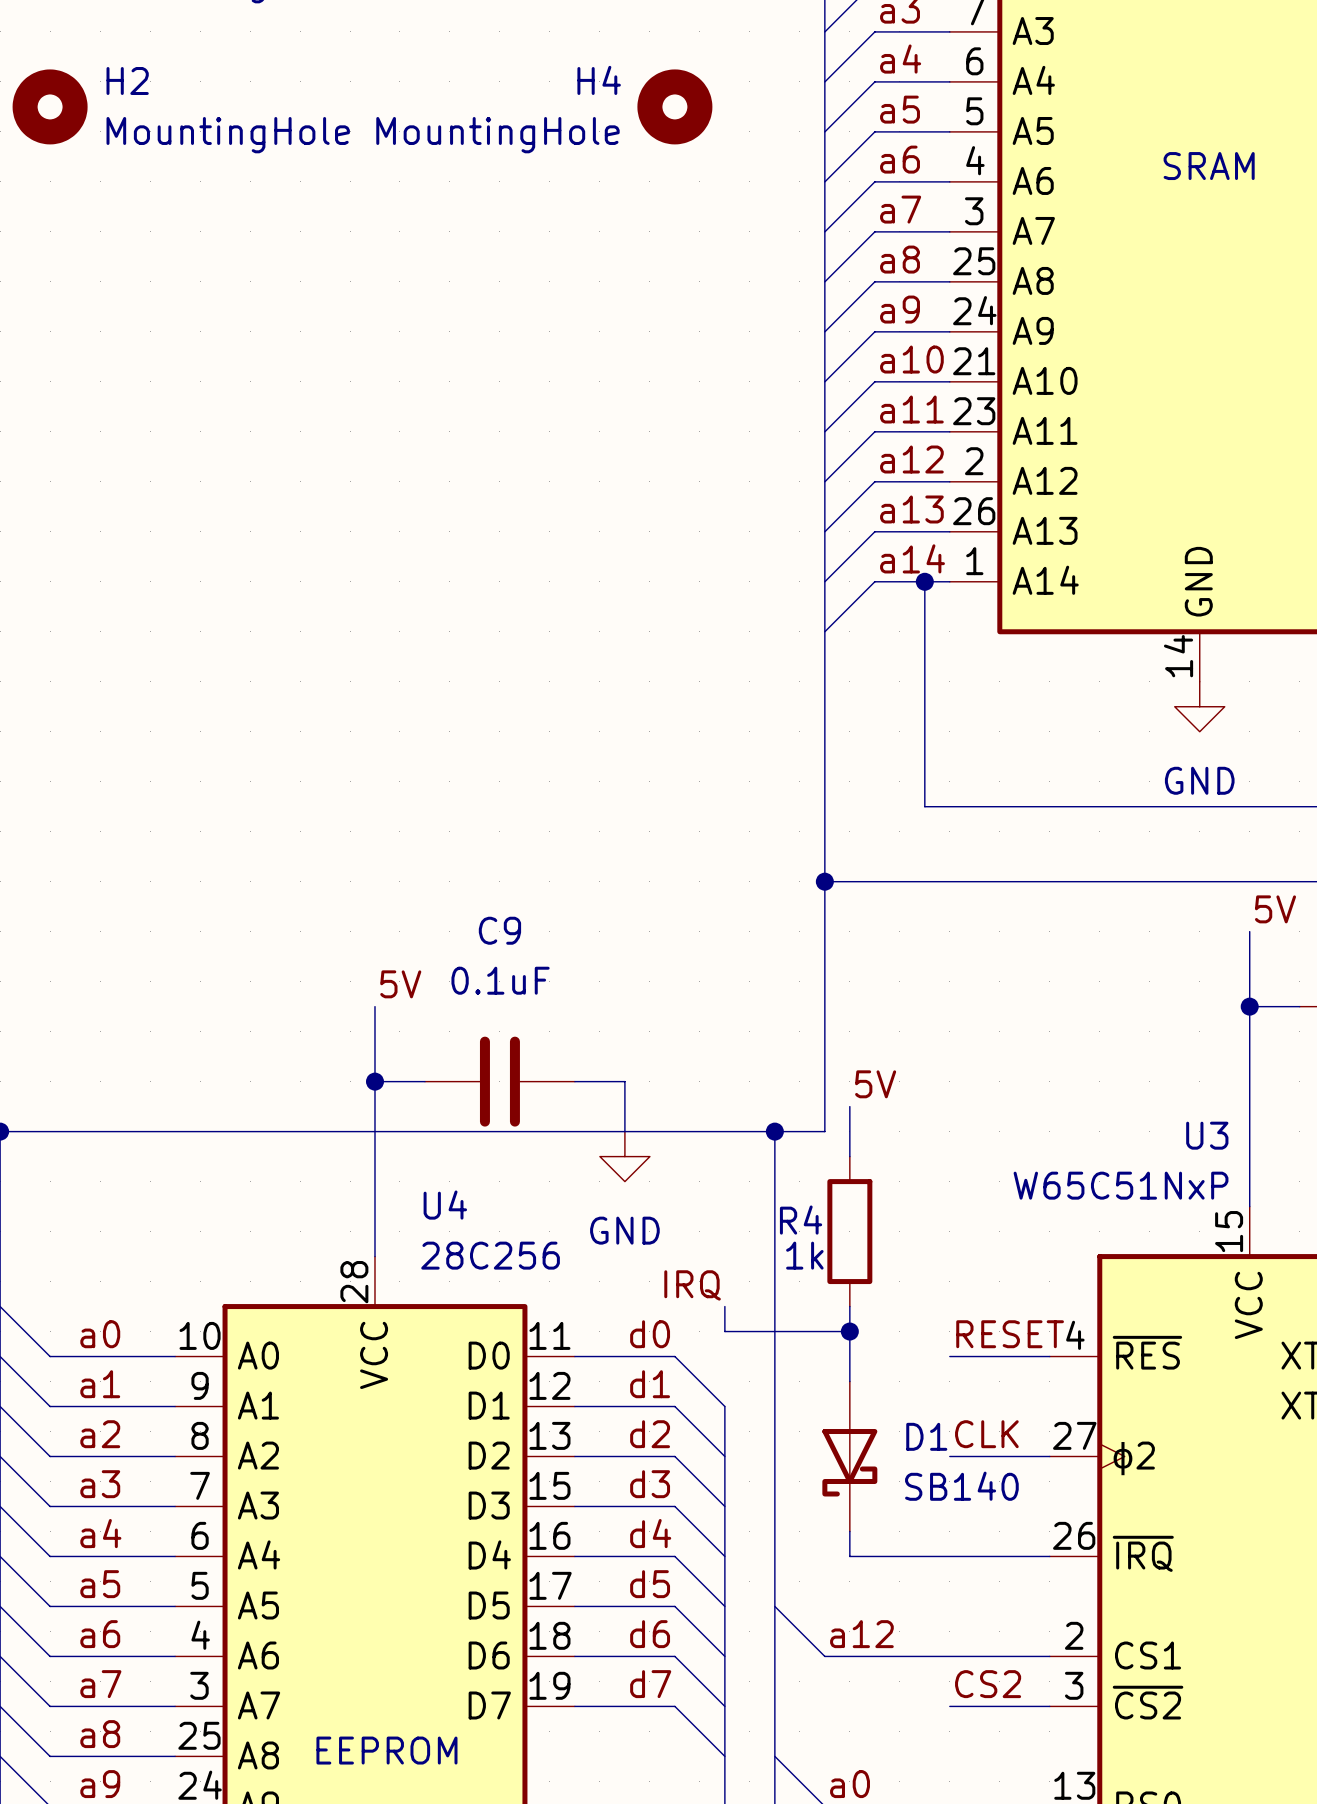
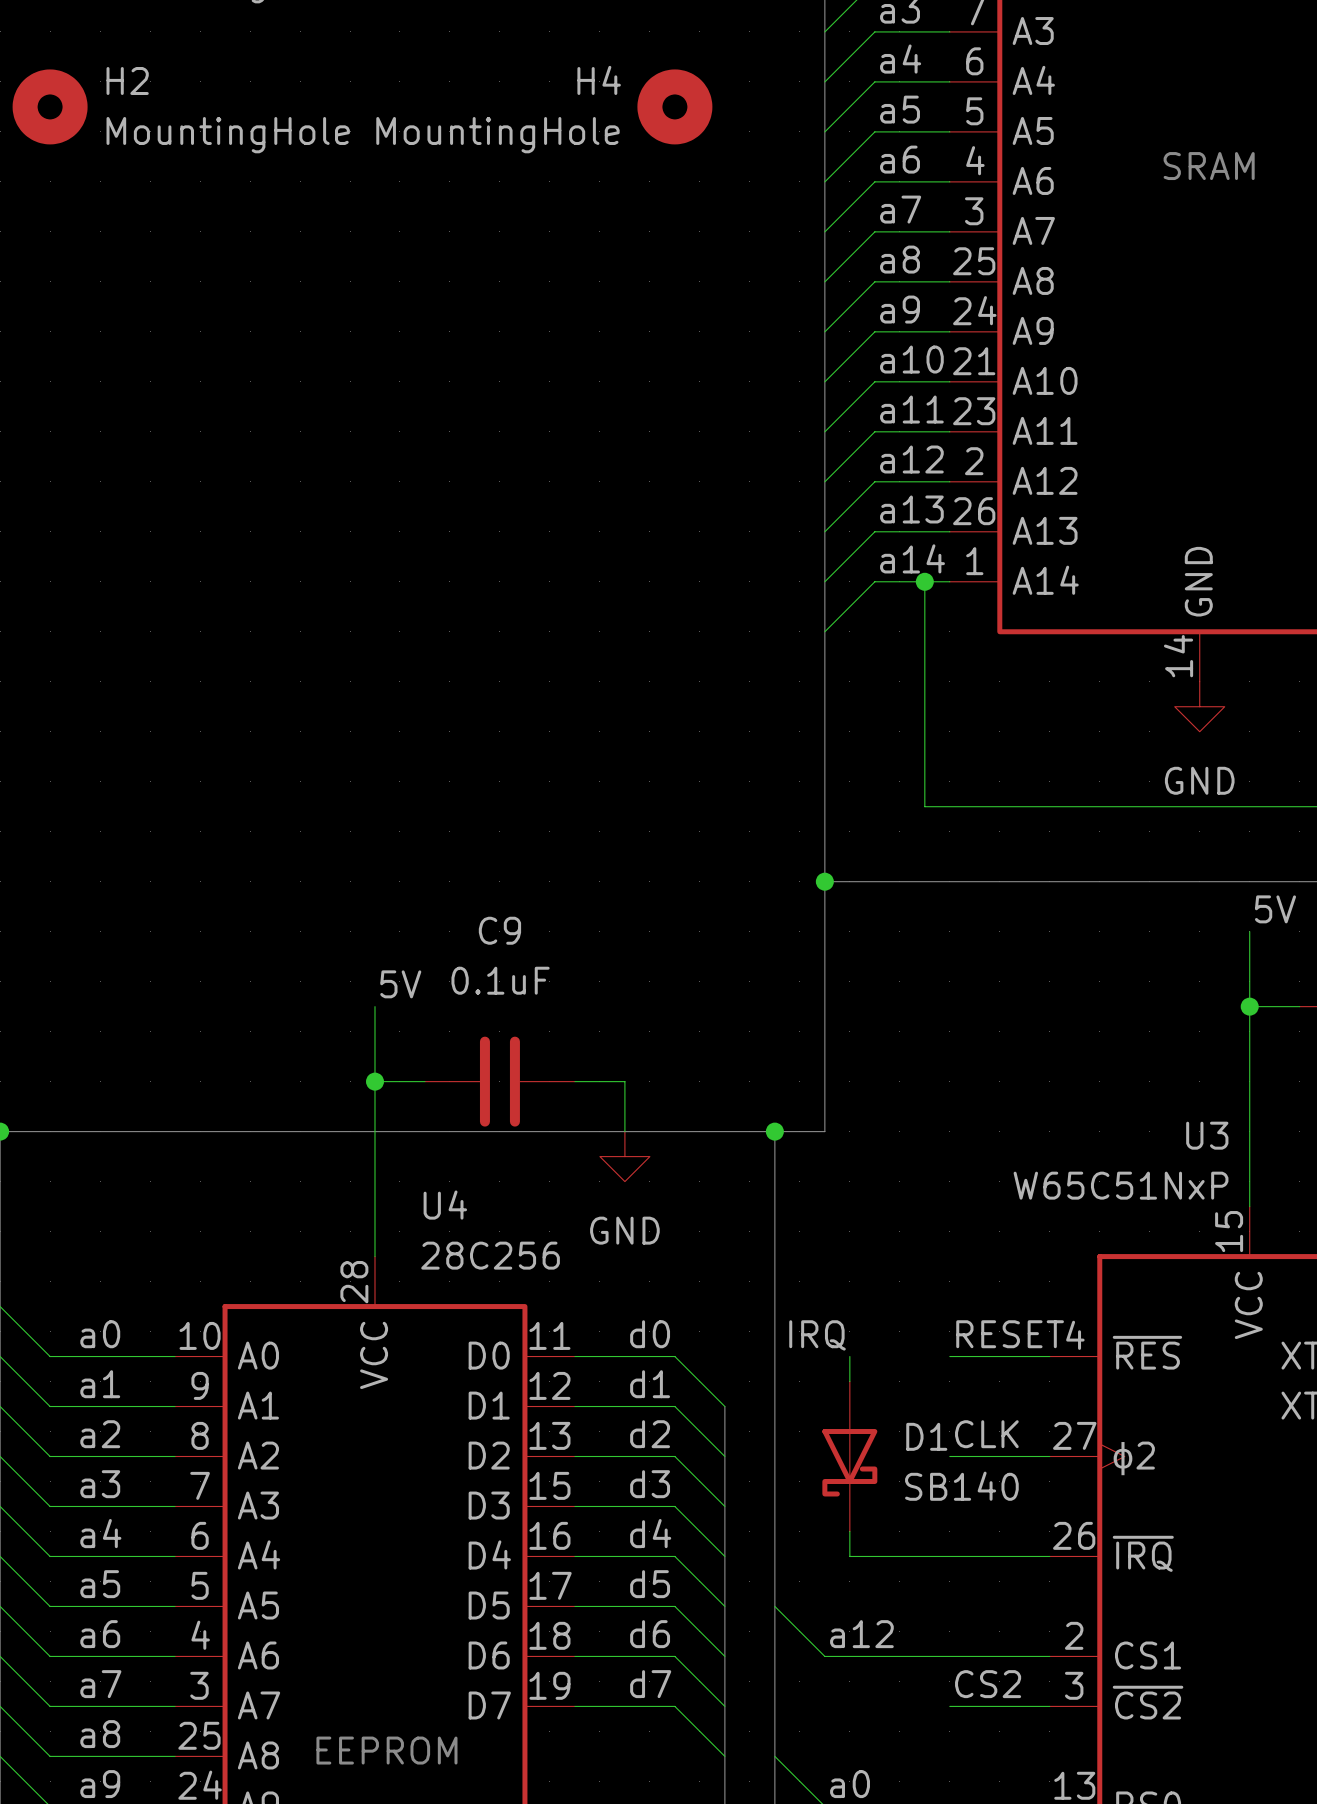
label: 5V (875, 1084) -> none
wire: (849, 1106) (849, 1156) -> none
R4: 1k (849, 1231) -> none
label position: IRQ (692, 1285) -> IRQ (817, 1335)
wire: (724, 1306) (724, 1331) (849, 1331) -> none
wire: (849, 1306) (849, 1356) -> none
junction: (849, 1331) -> none

